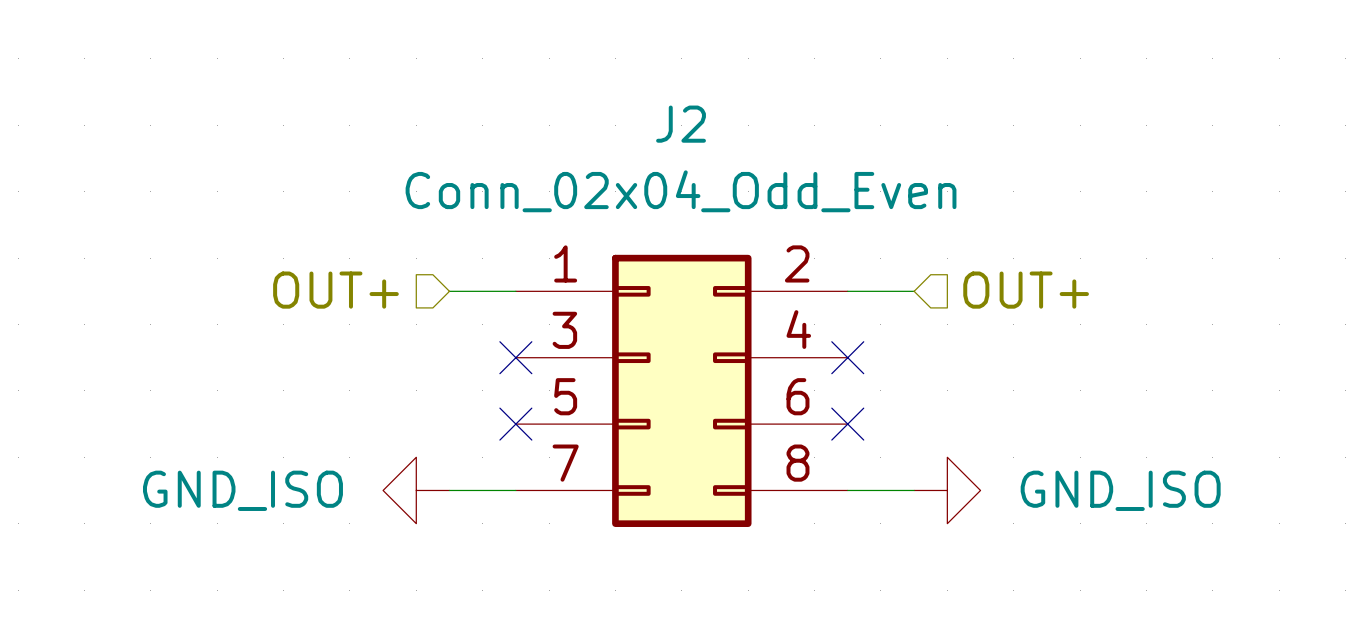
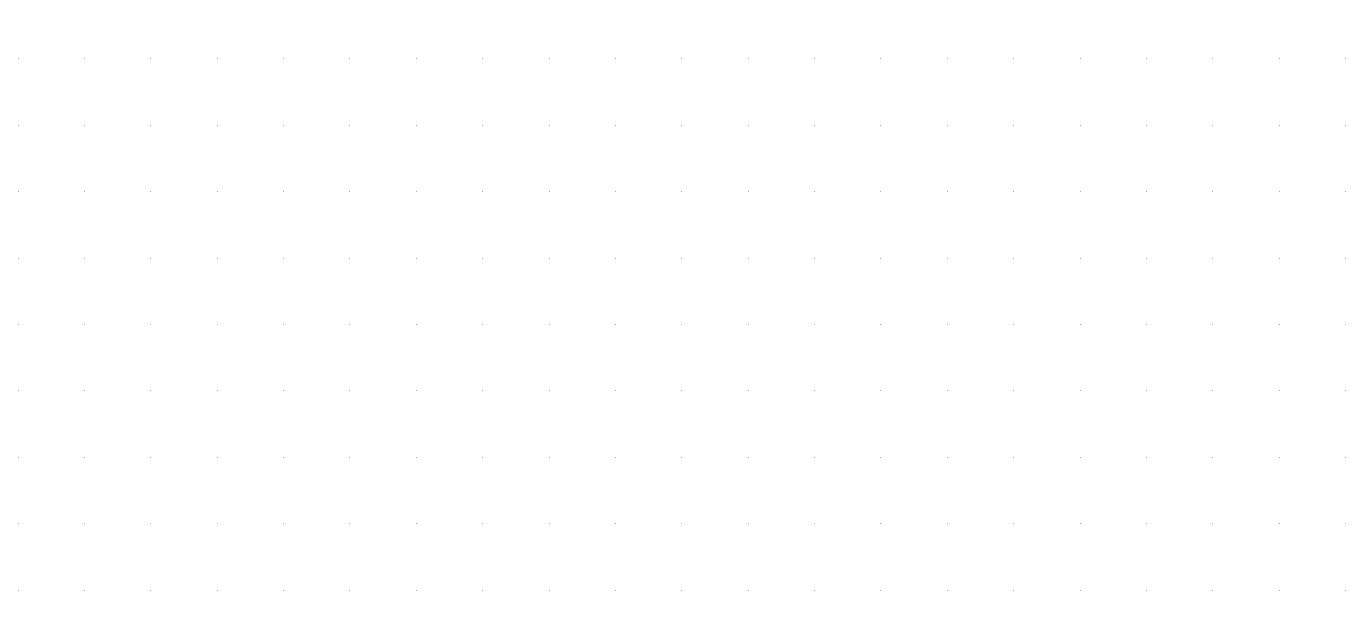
hierarchical label: OUT+ (335, 290) -> none
hierarchical label: OUT+ (1026, 290) -> none
wire: (449, 291) (515, 291) -> none
wire: (847, 291) (914, 291) -> none
no-connect mark: (515, 357) -> none
no-connect mark: (847, 357) -> none
J2: Conn_02x04_Odd_Even (681, 390) -> none
no-connect mark: (515, 424) -> none
no-connect mark: (847, 424) -> none
power symbol: GND_ISO (416, 490) -> none
wire: (449, 490) (515, 490) -> none
wire: (847, 490) (914, 490) -> none
power symbol: GND_ISO (947, 490) -> none

